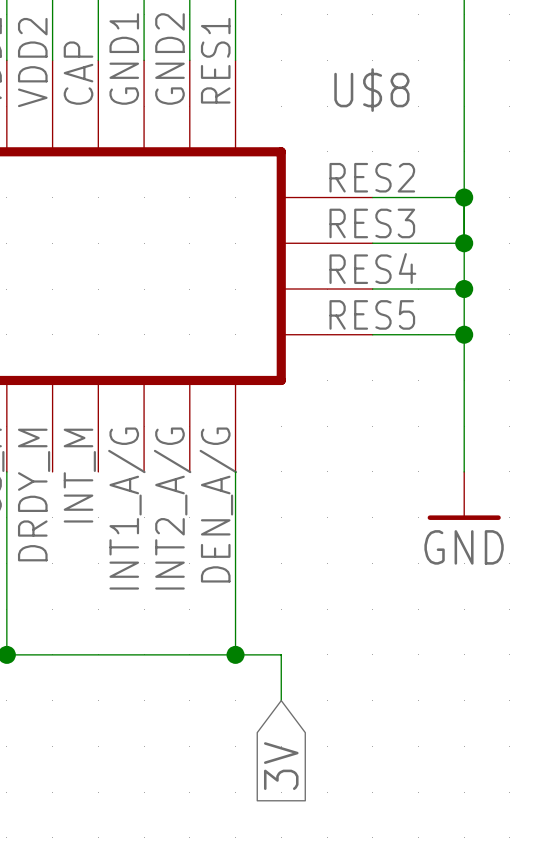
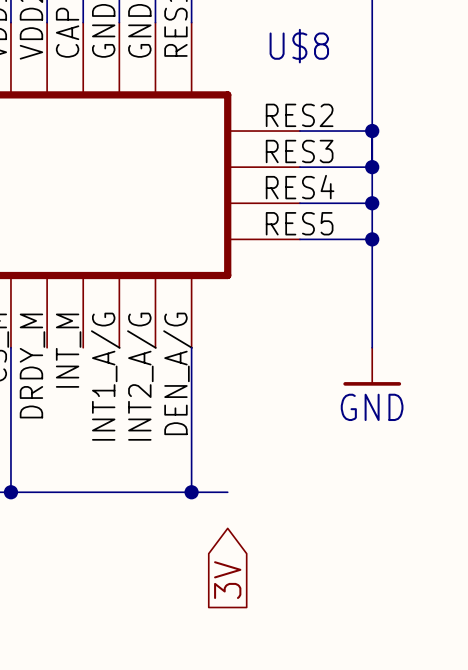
wire: (281, 654) (281, 700) -> none

